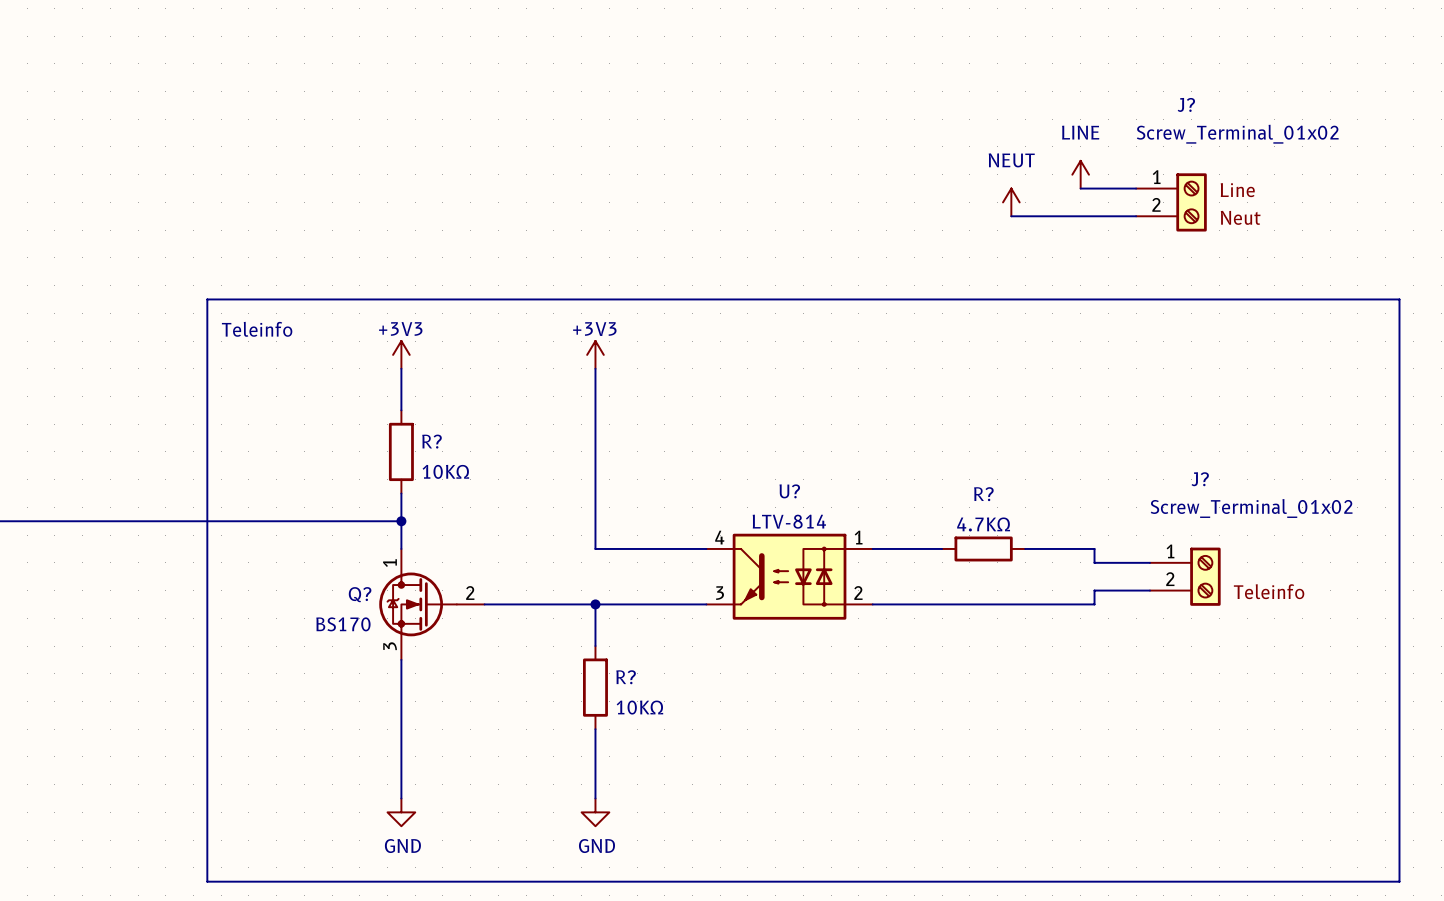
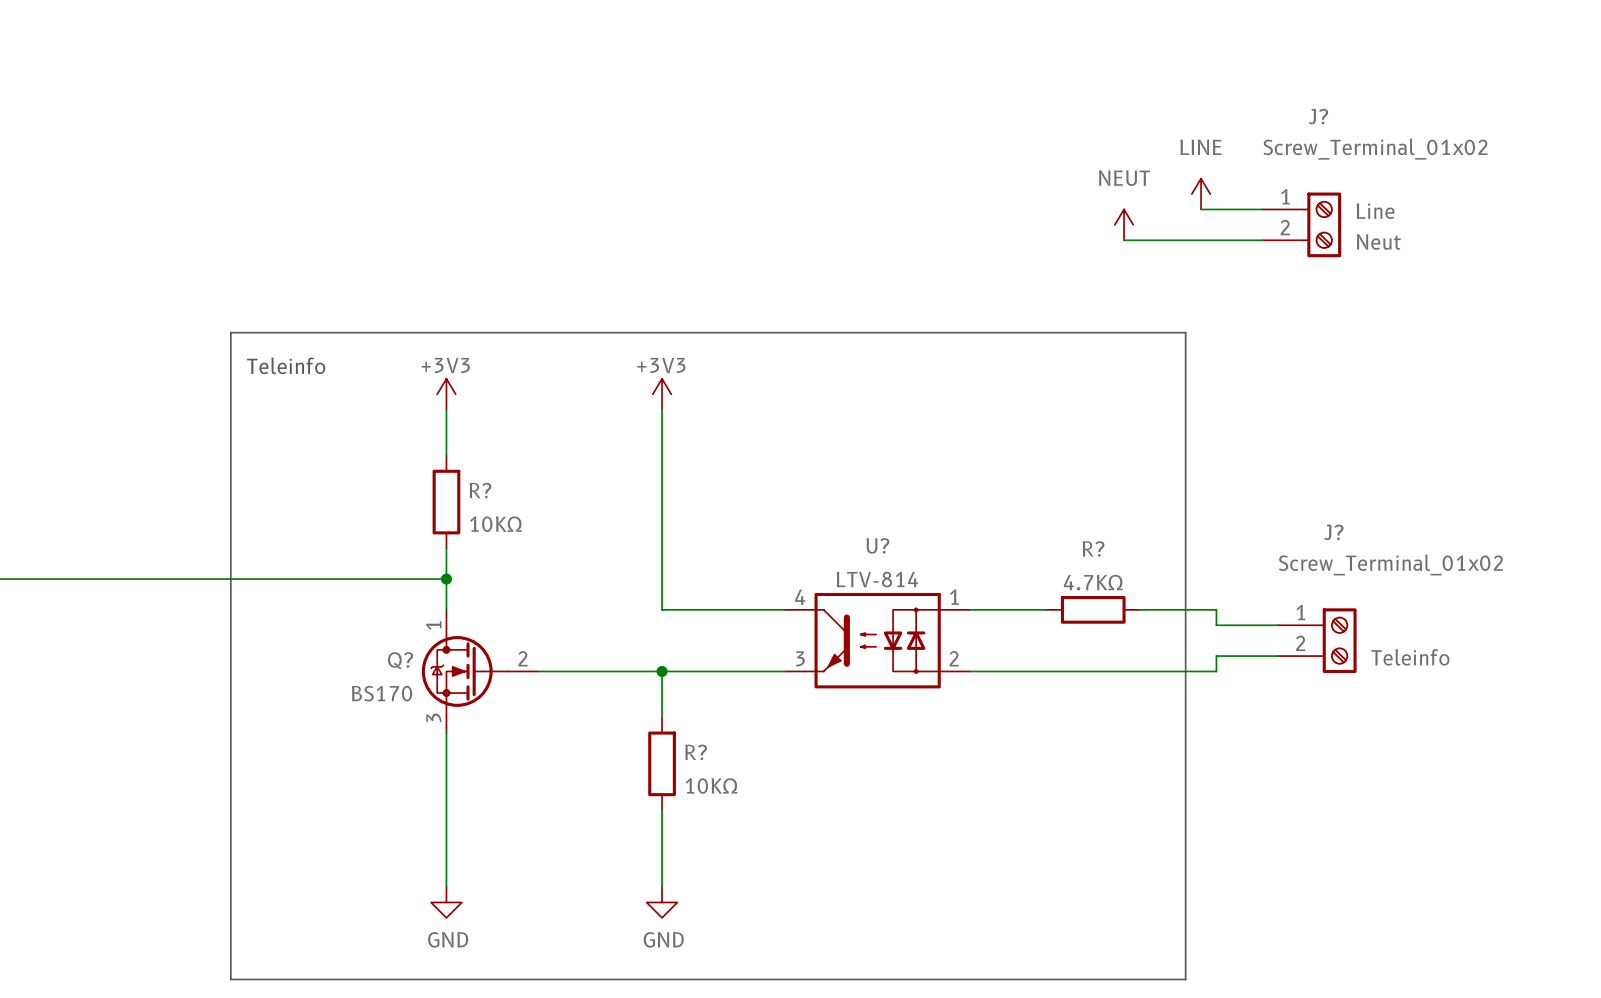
line: (1066, 299) (1399, 299) (1399, 881) (1066, 881) -> (1185, 332) (1185, 979)

